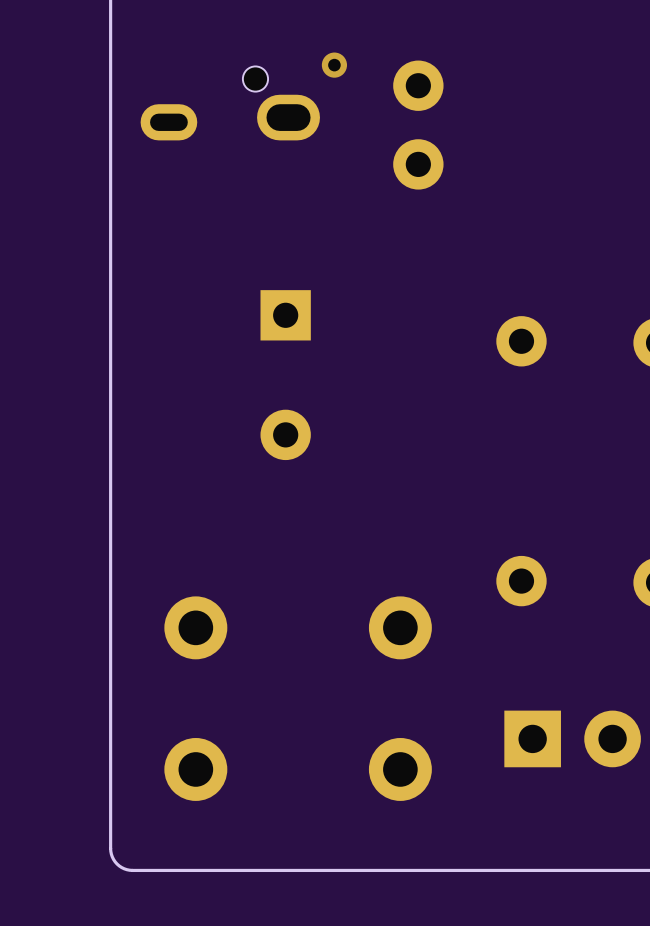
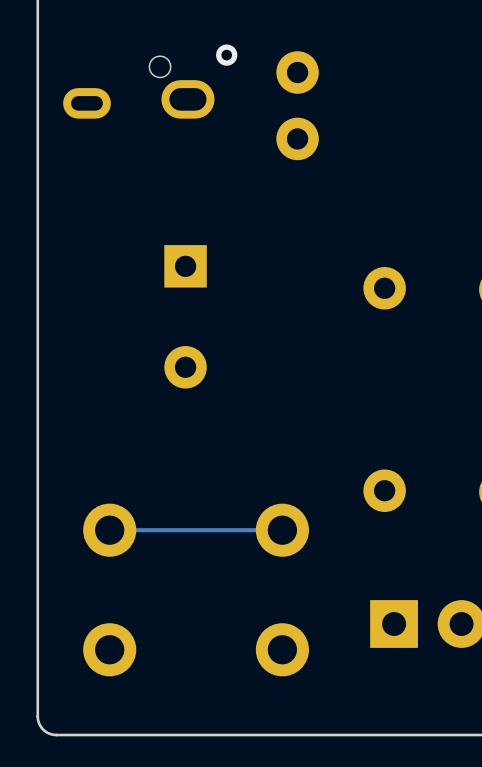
track: none -> (282, 530) (109, 530)

